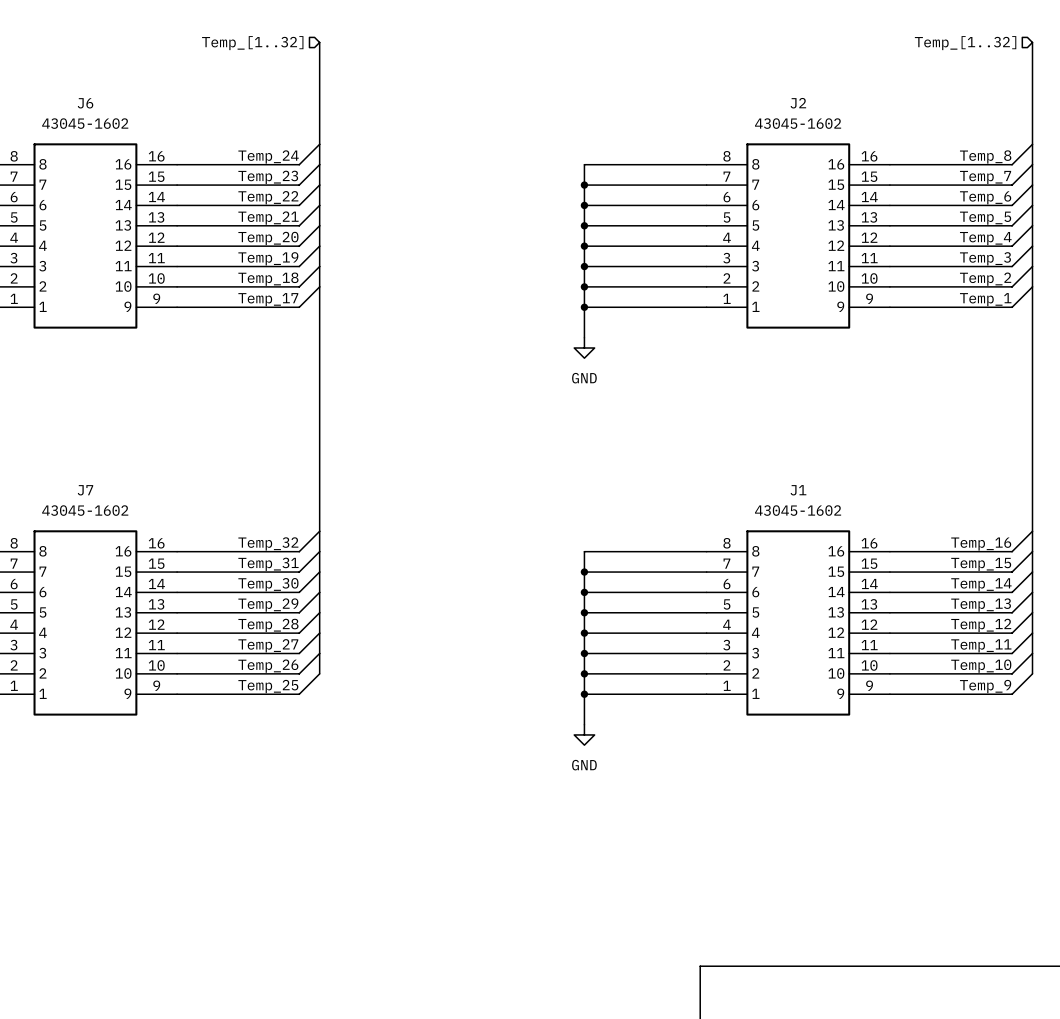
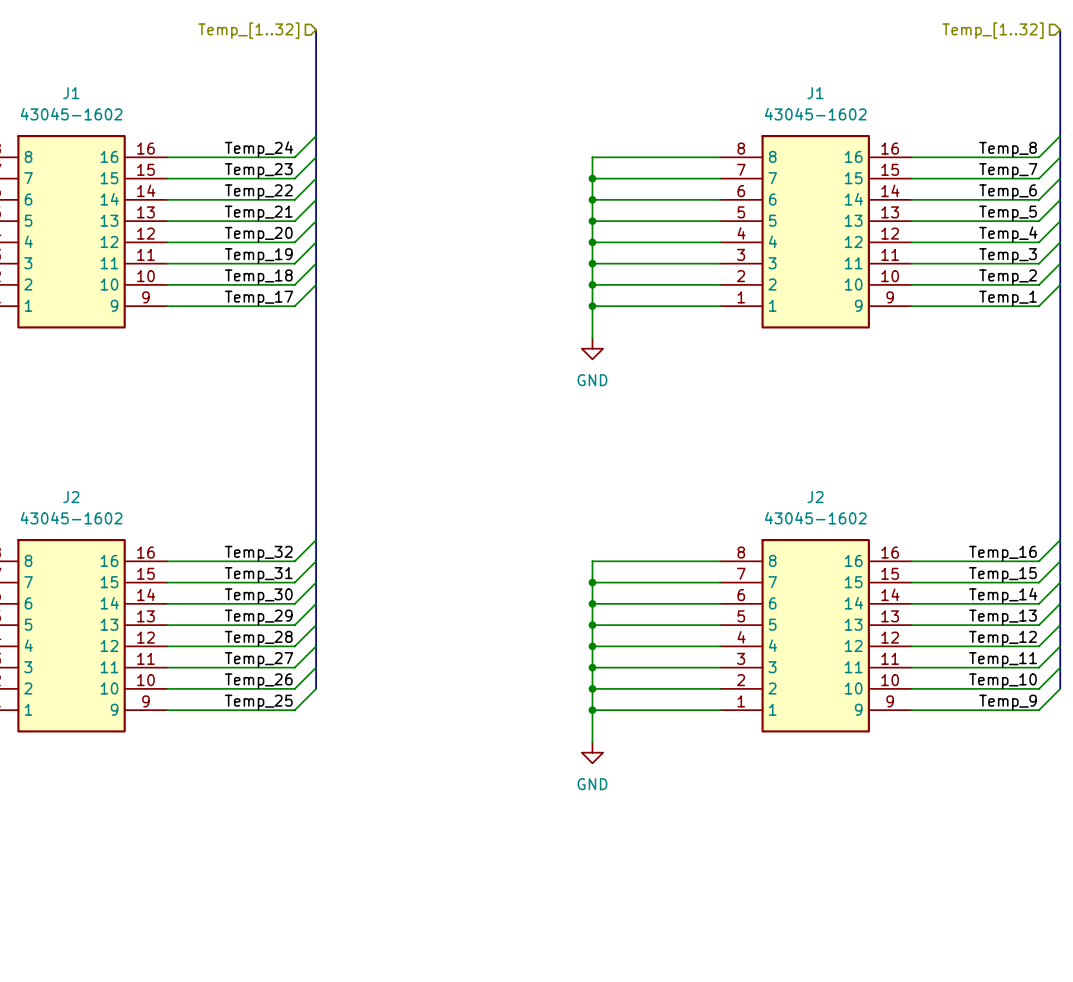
J6 name: J6 (85, 103) -> J1 (71, 93)
J2 name: J2 (798, 103) -> J1 (815, 93)
J7 name: J7 (85, 490) -> J2 (71, 497)
J1 name: J1 (798, 490) -> J2 (815, 497)

